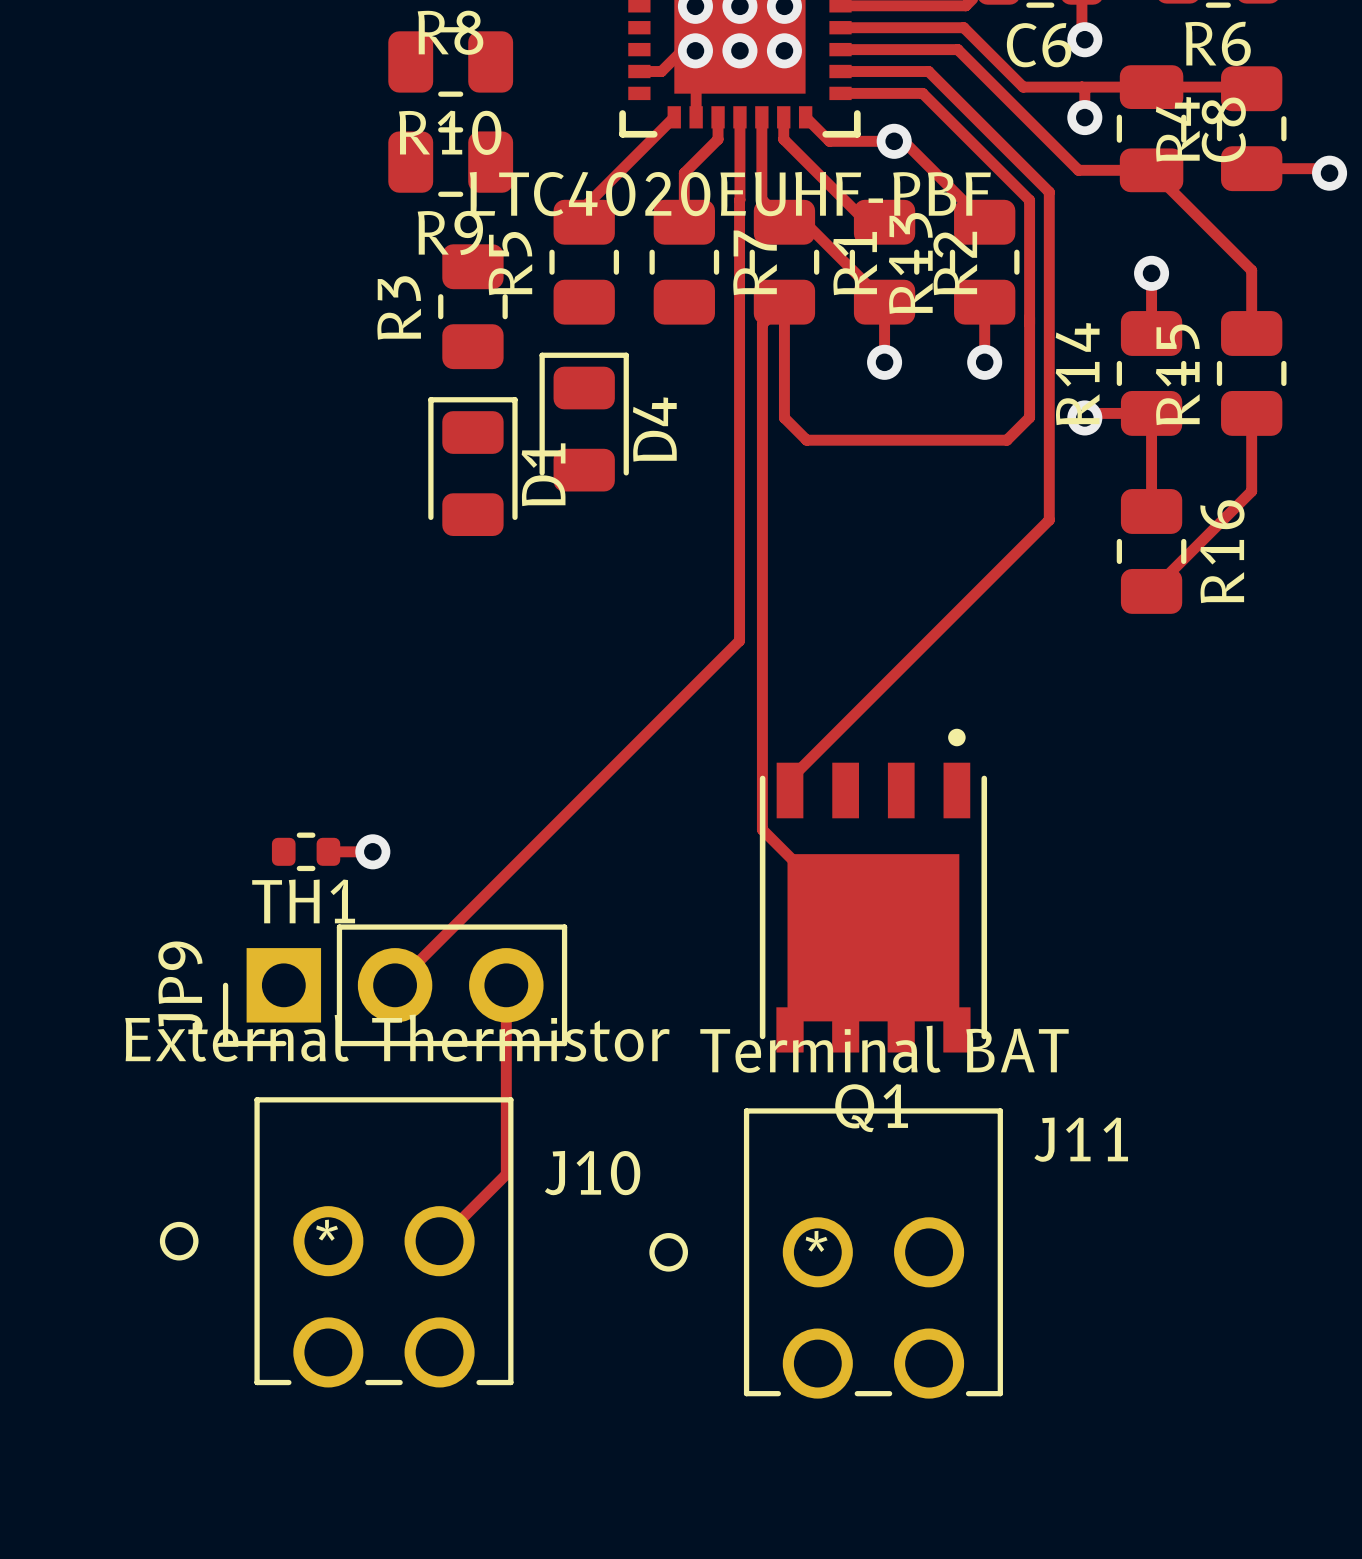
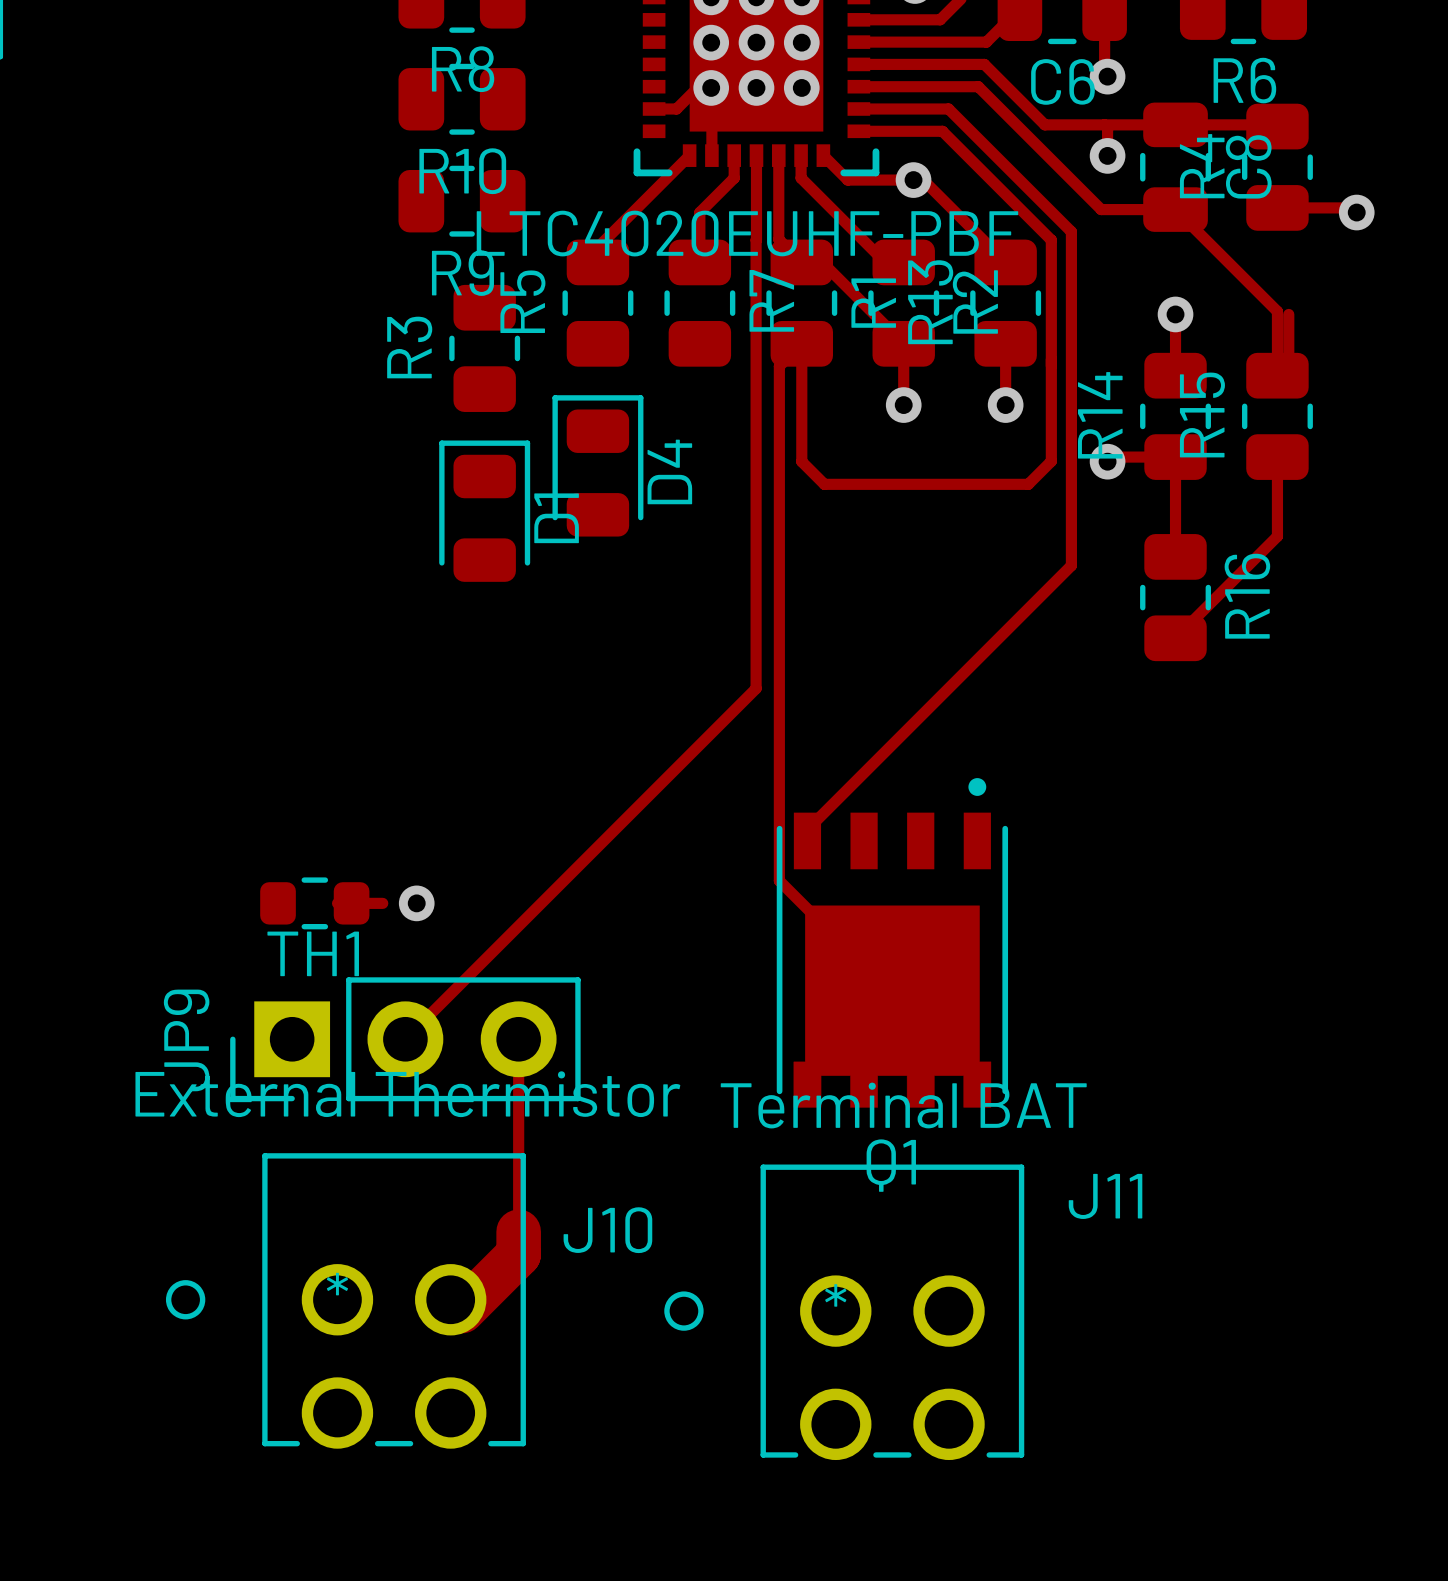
track: none -> (1288, 314) (1288, 375)
TH1 footprint: [271, 832, 341, 872] -> [260, 877, 370, 930]
via position: (372, 851) -> (416, 903)
track: (506, 1174) (439, 1241) -> (518, 1231) (518, 1254) (462, 1311)

